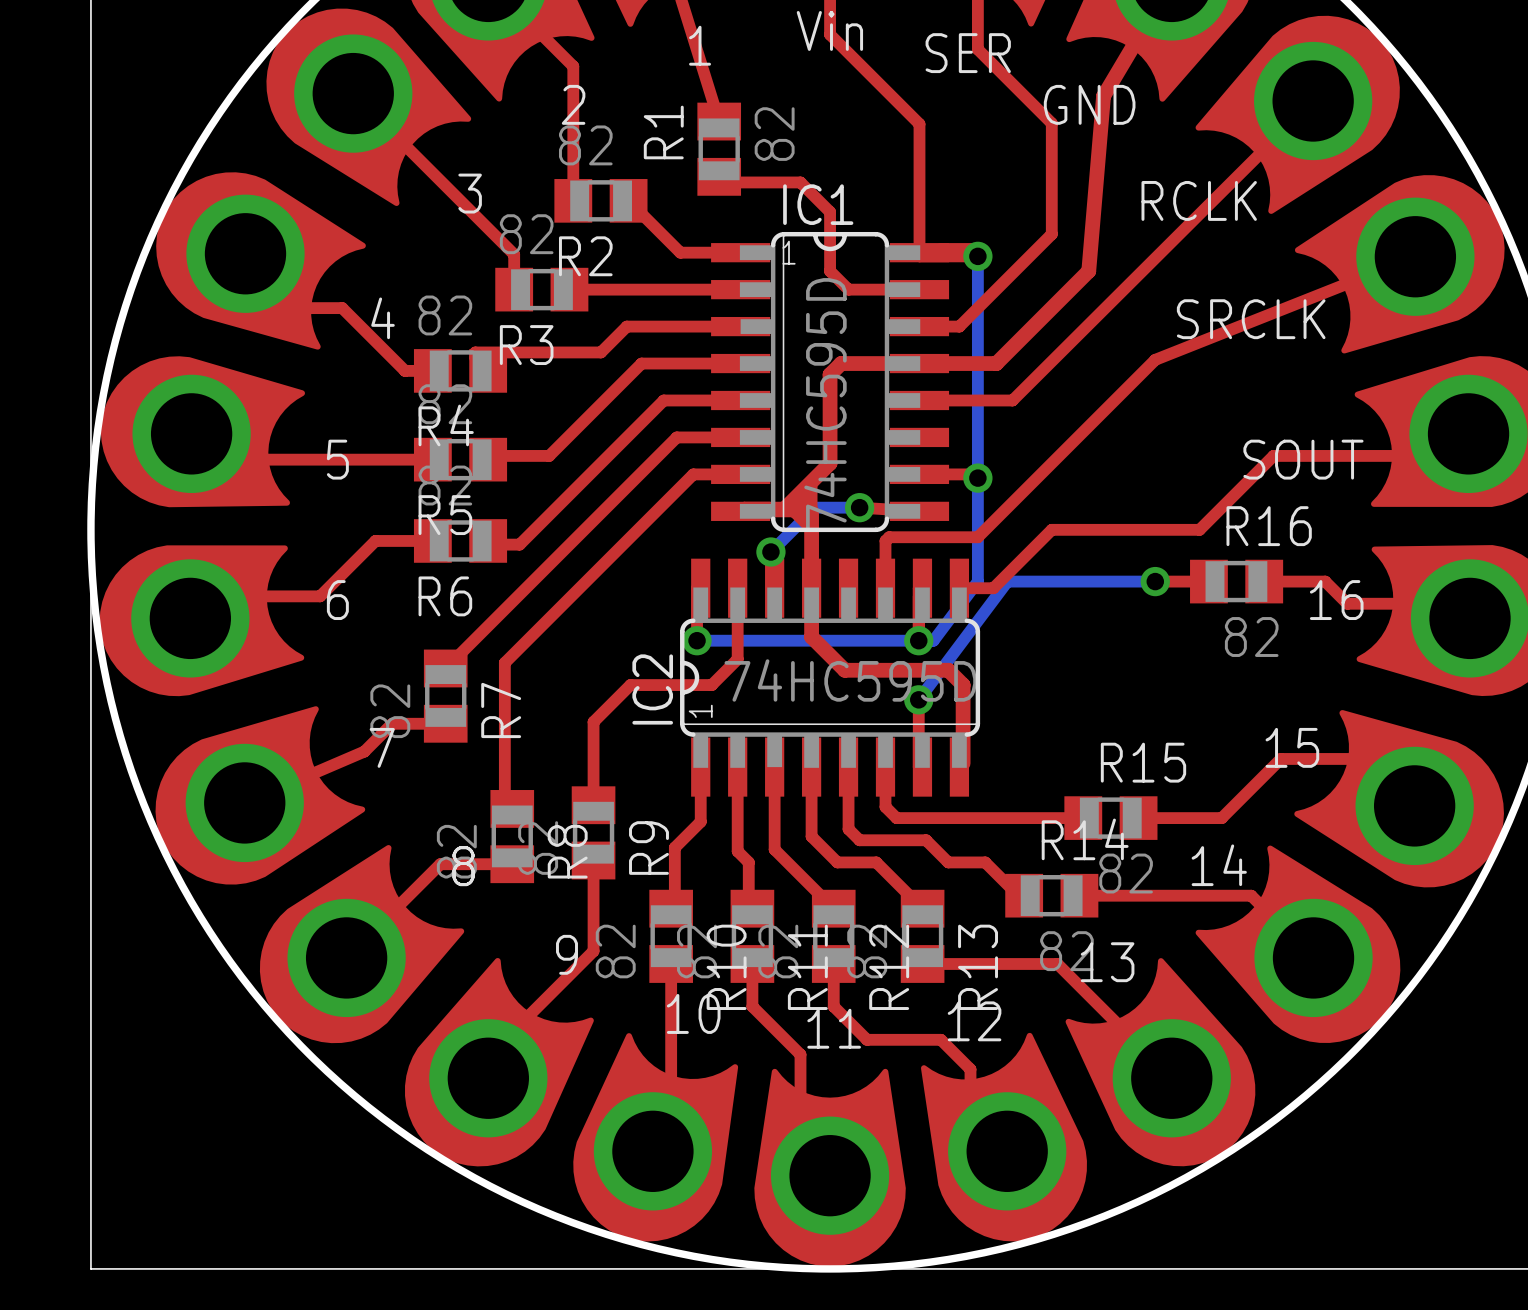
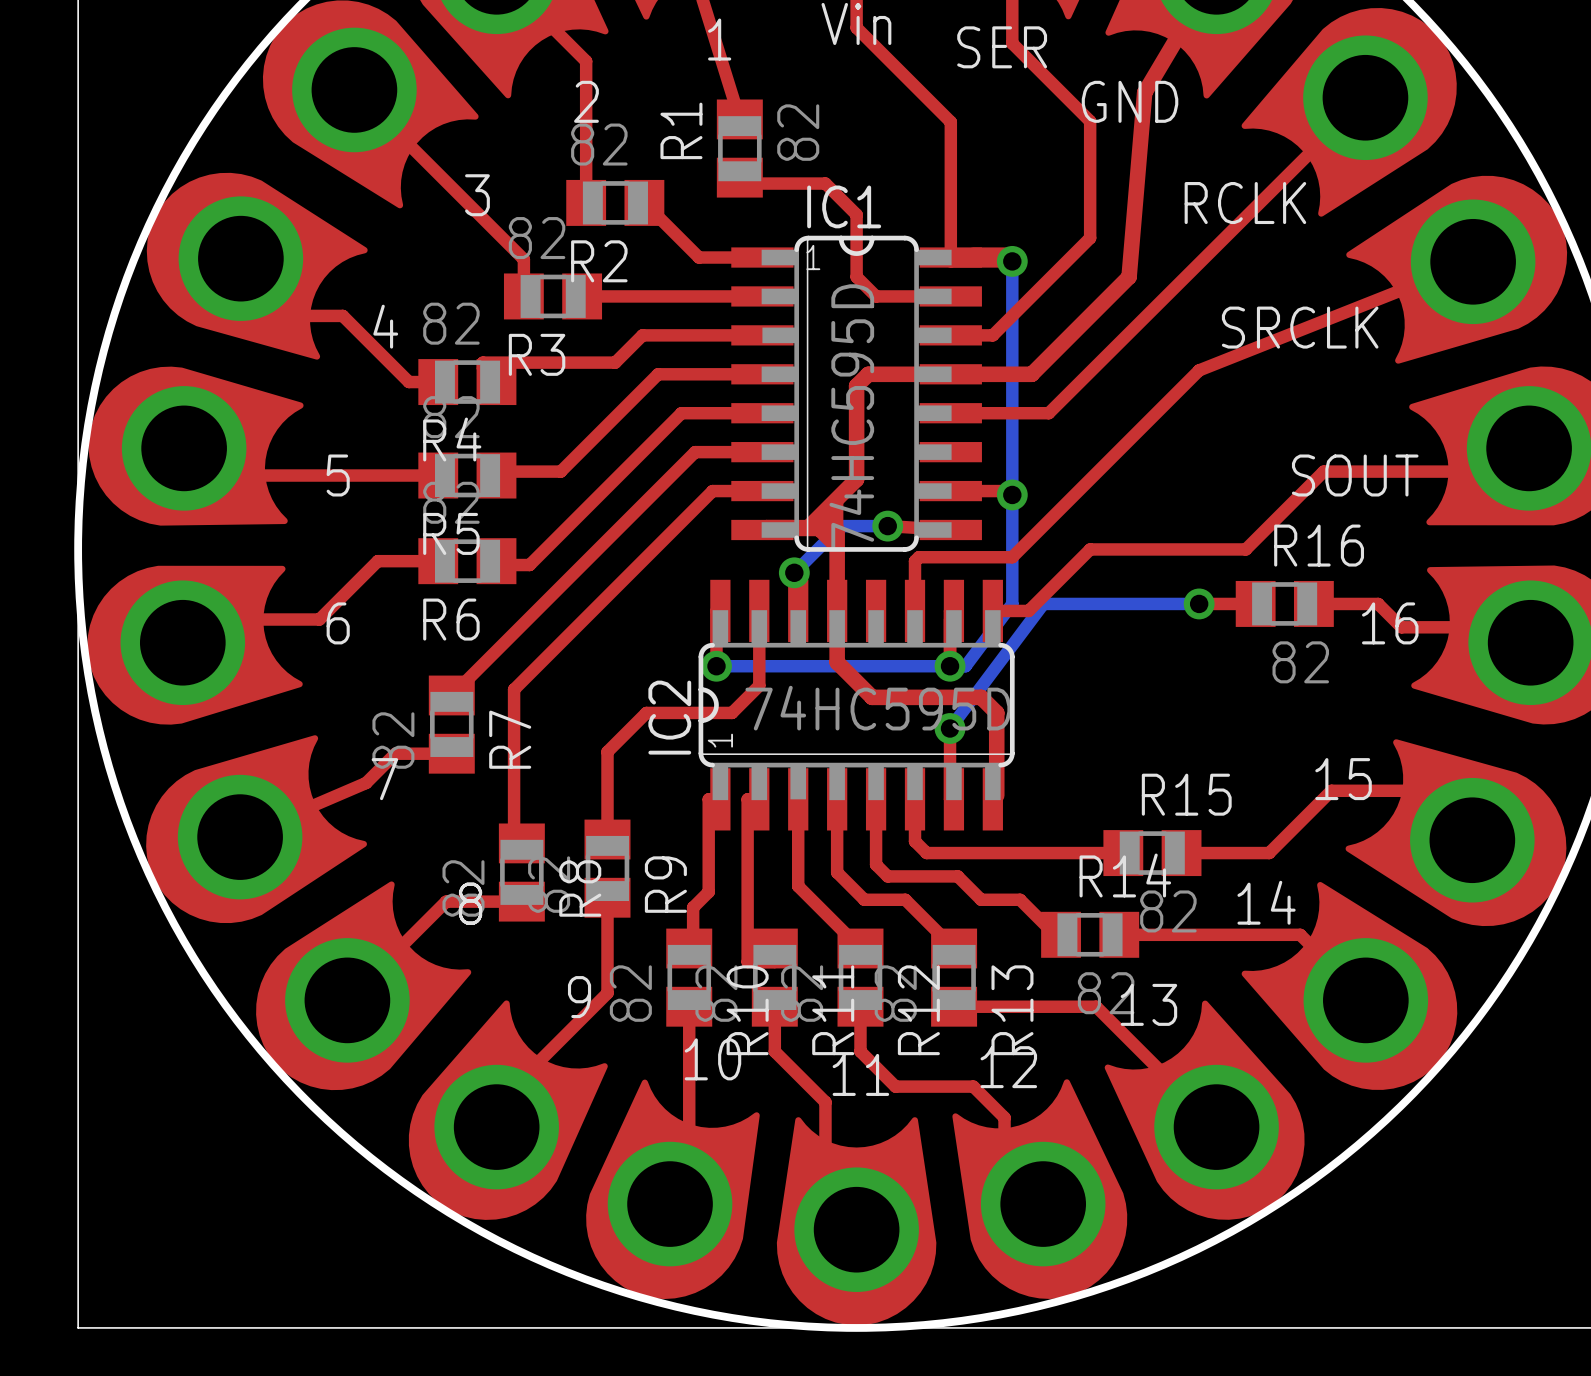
top track: (700, 767) (700, 821) (674, 847) (674, 869) -> (720, 799) (708, 799) (708, 891) (693, 907)
top track: (737, 767) (737, 851) (748, 862) (748, 905) (752, 908) -> (759, 799) (747, 799) (747, 962) (774, 962) (774, 948)

